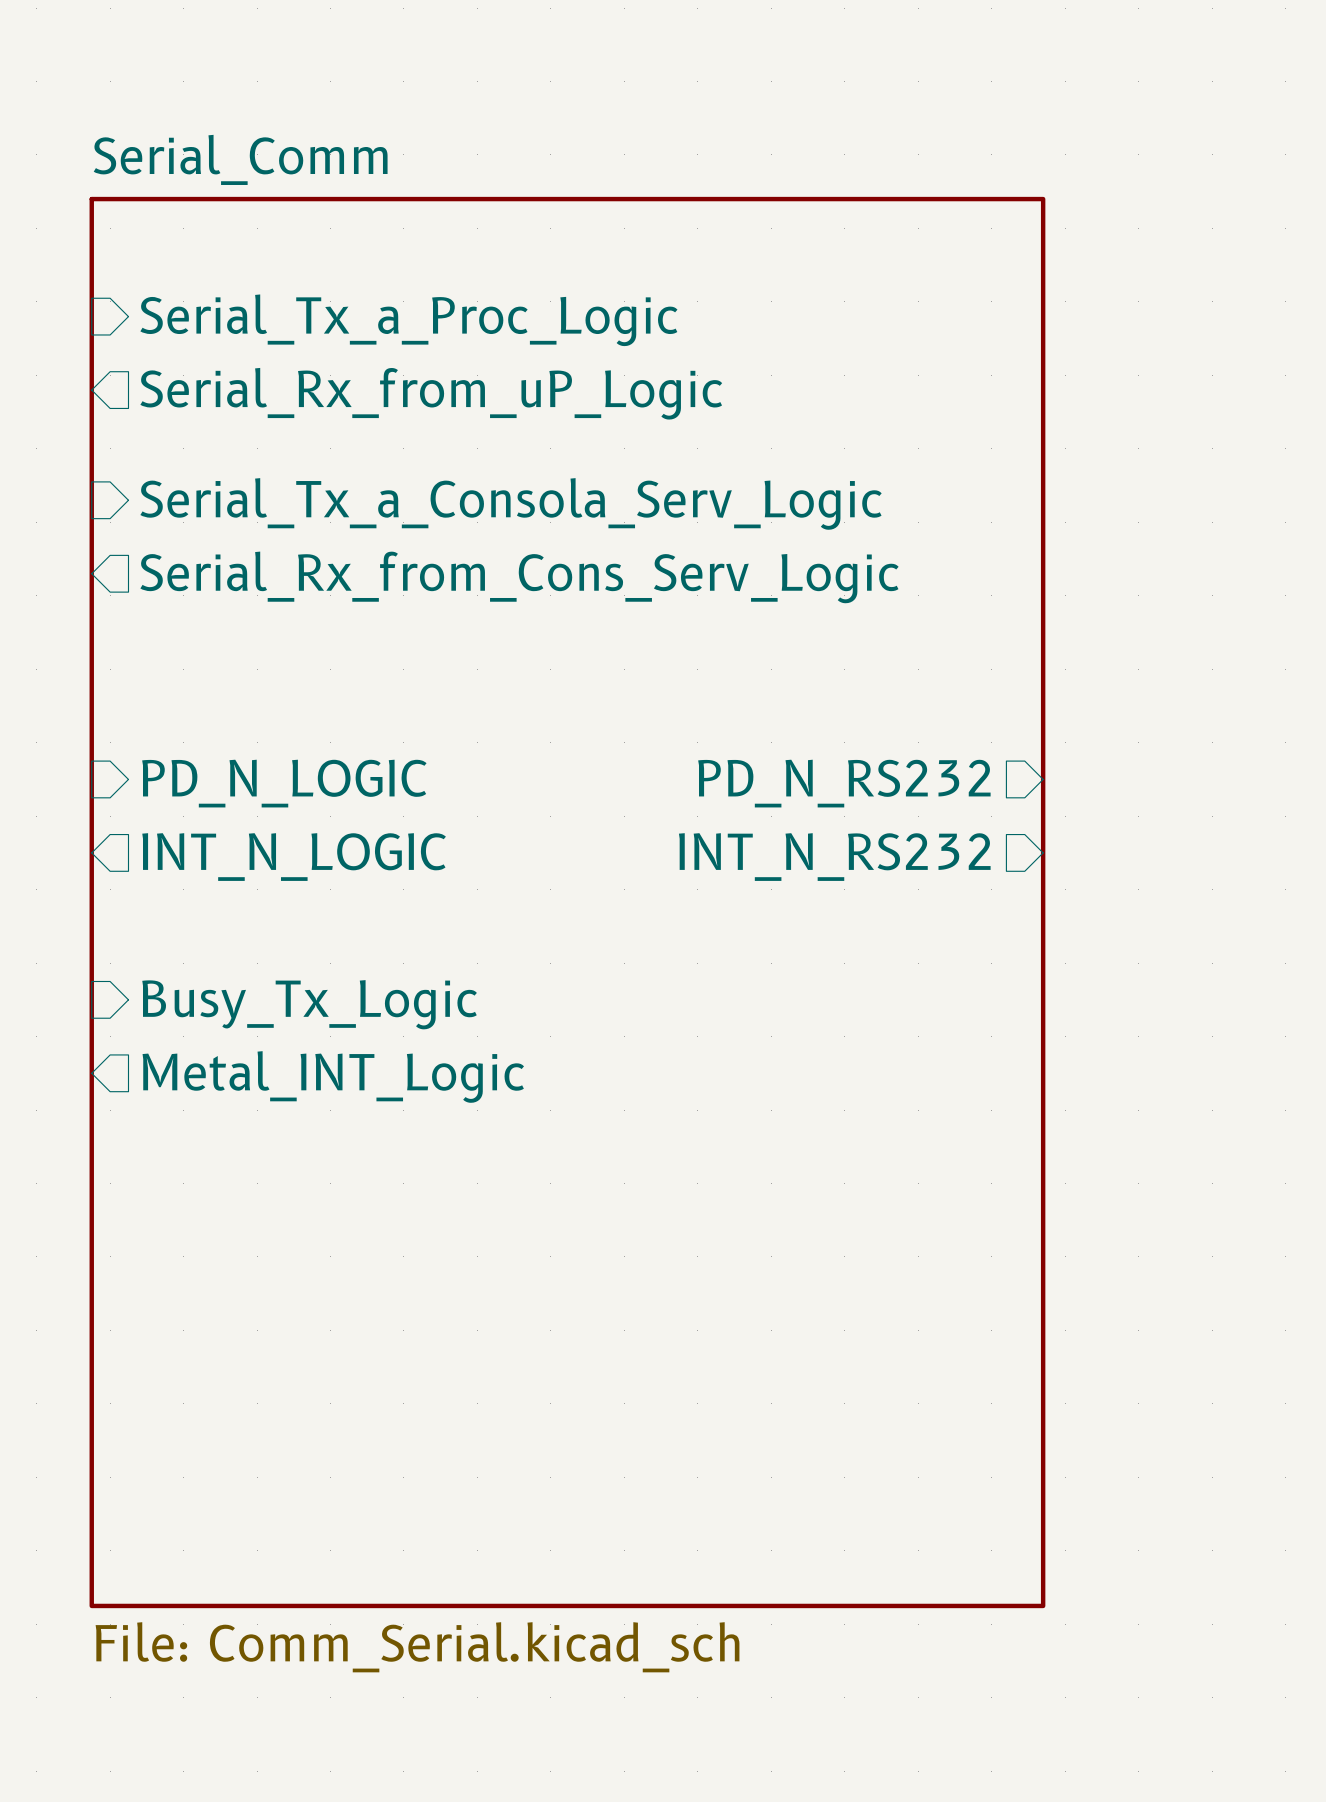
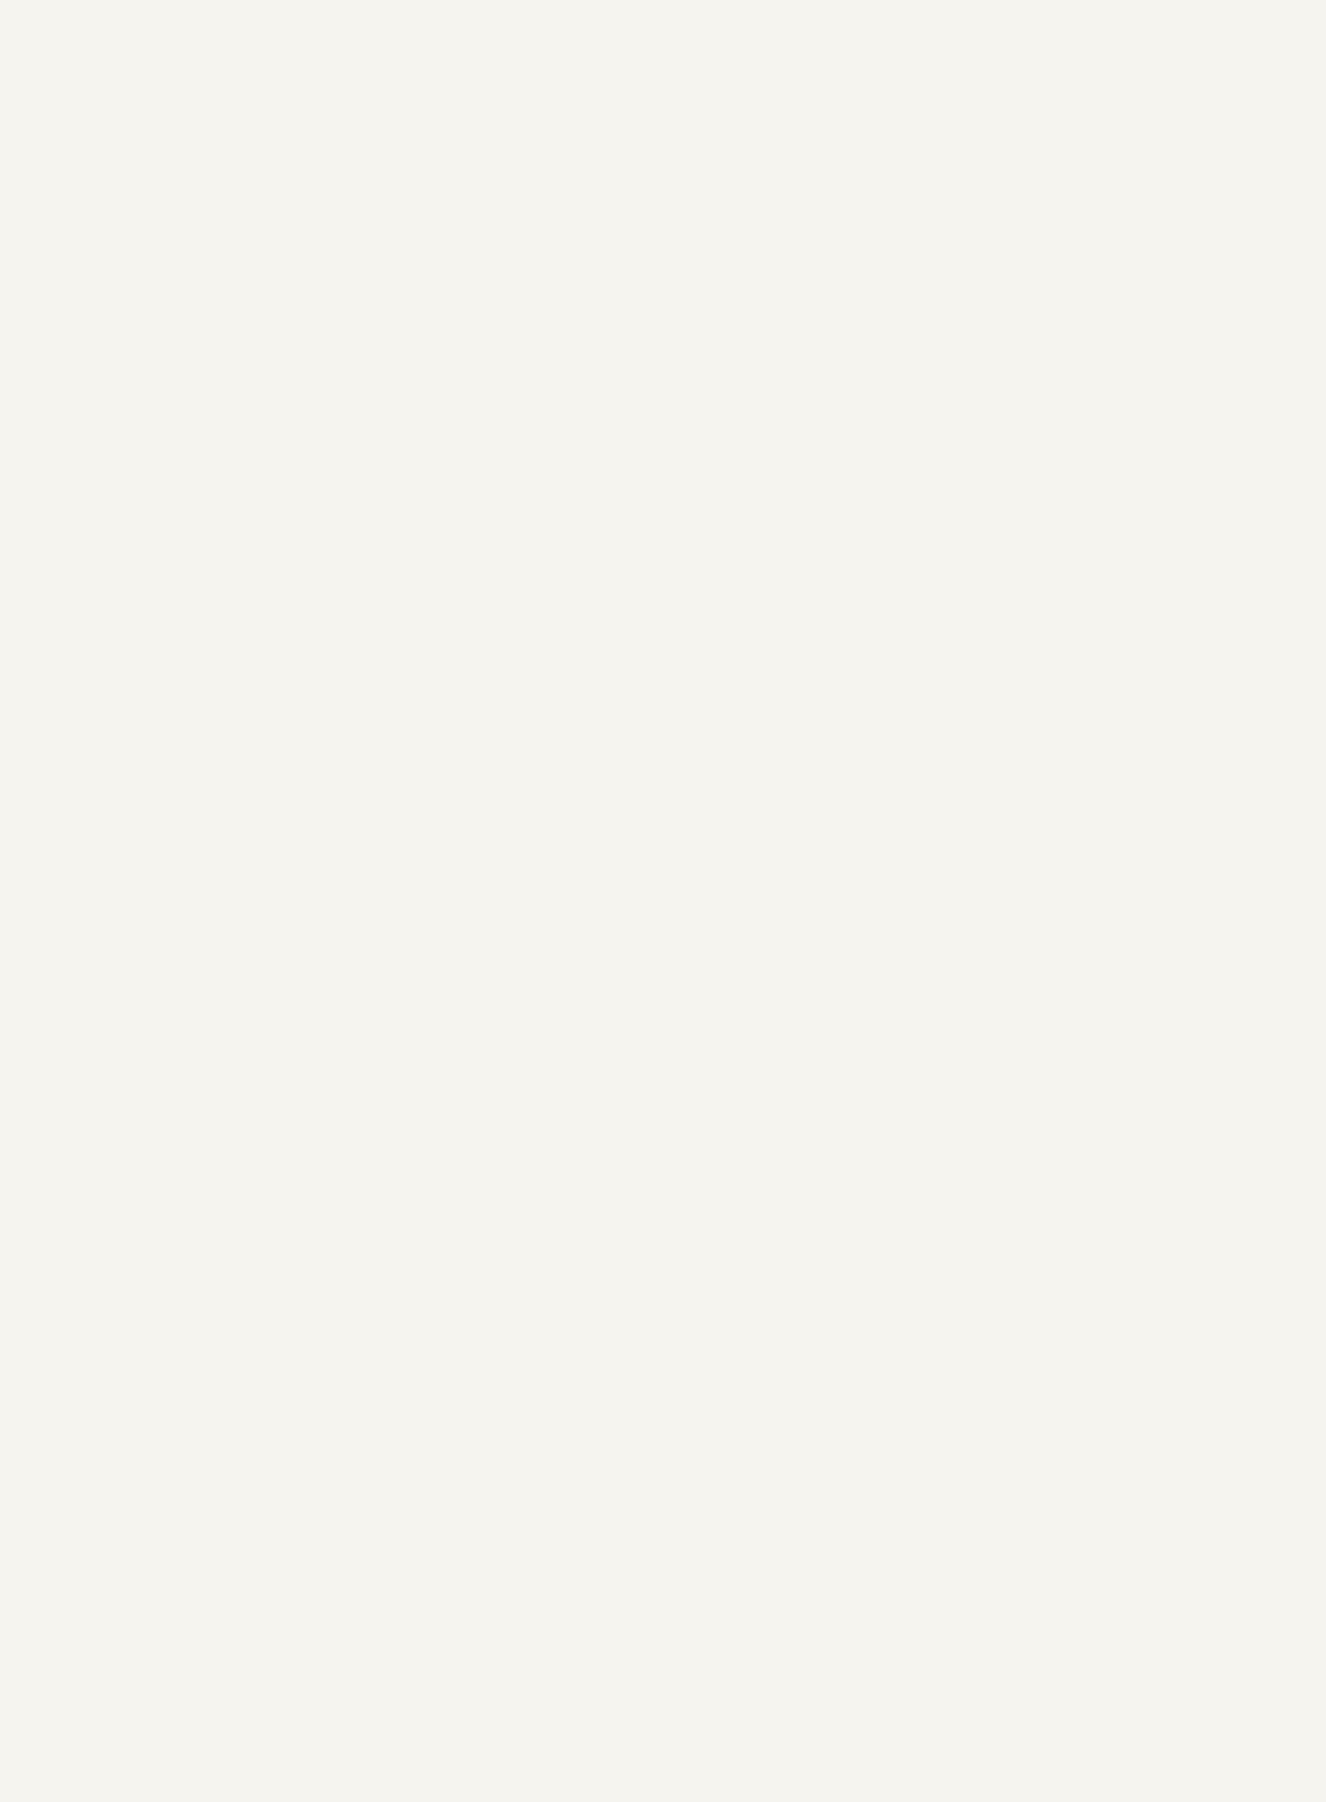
sheet pin: Serial_Tx_a_Proc_Logic (408, 320) -> none
sheet pin: Serial_Rx_from_uP_Logic (431, 393) -> none
sheet pin: Serial_Tx_a_Consola_Serv_Logic (511, 503) -> none
sheet pin: Serial_Rx_from_Cons_Serv_Logic (519, 577) -> none
sheet pin: PD_N_LOGIC (284, 783) -> none
sheet pin: PD_N_RS232 (844, 783) -> none
sheet pin: INT_N_LOGIC (294, 857) -> none
sheet pin: INT_N_RS232 (834, 857) -> none
sheet Serial_Comm: File: Comm_Serial.kicad_sch (567, 902) -> none
sheet pin: Busy_Tx_Logic (309, 1004) -> none
sheet pin: Metal_INT_Logic (333, 1076) -> none

